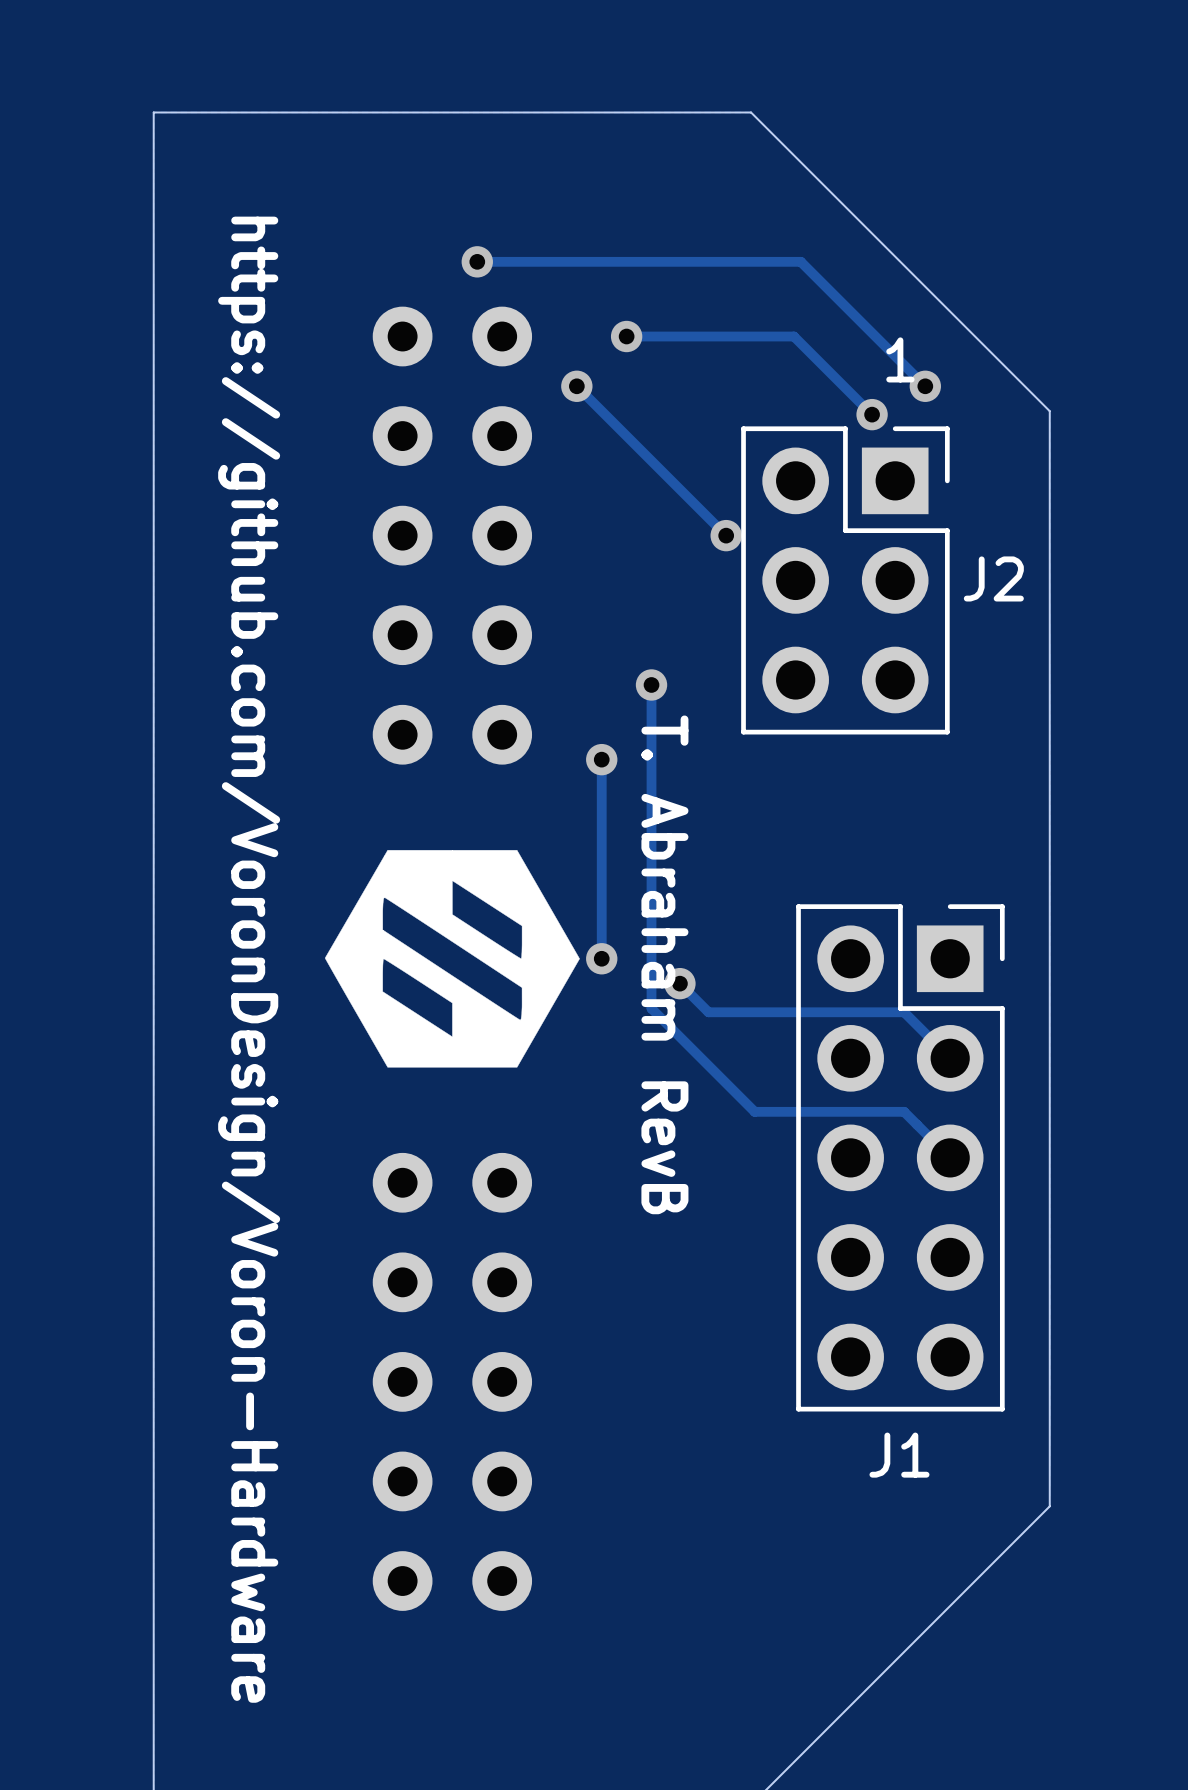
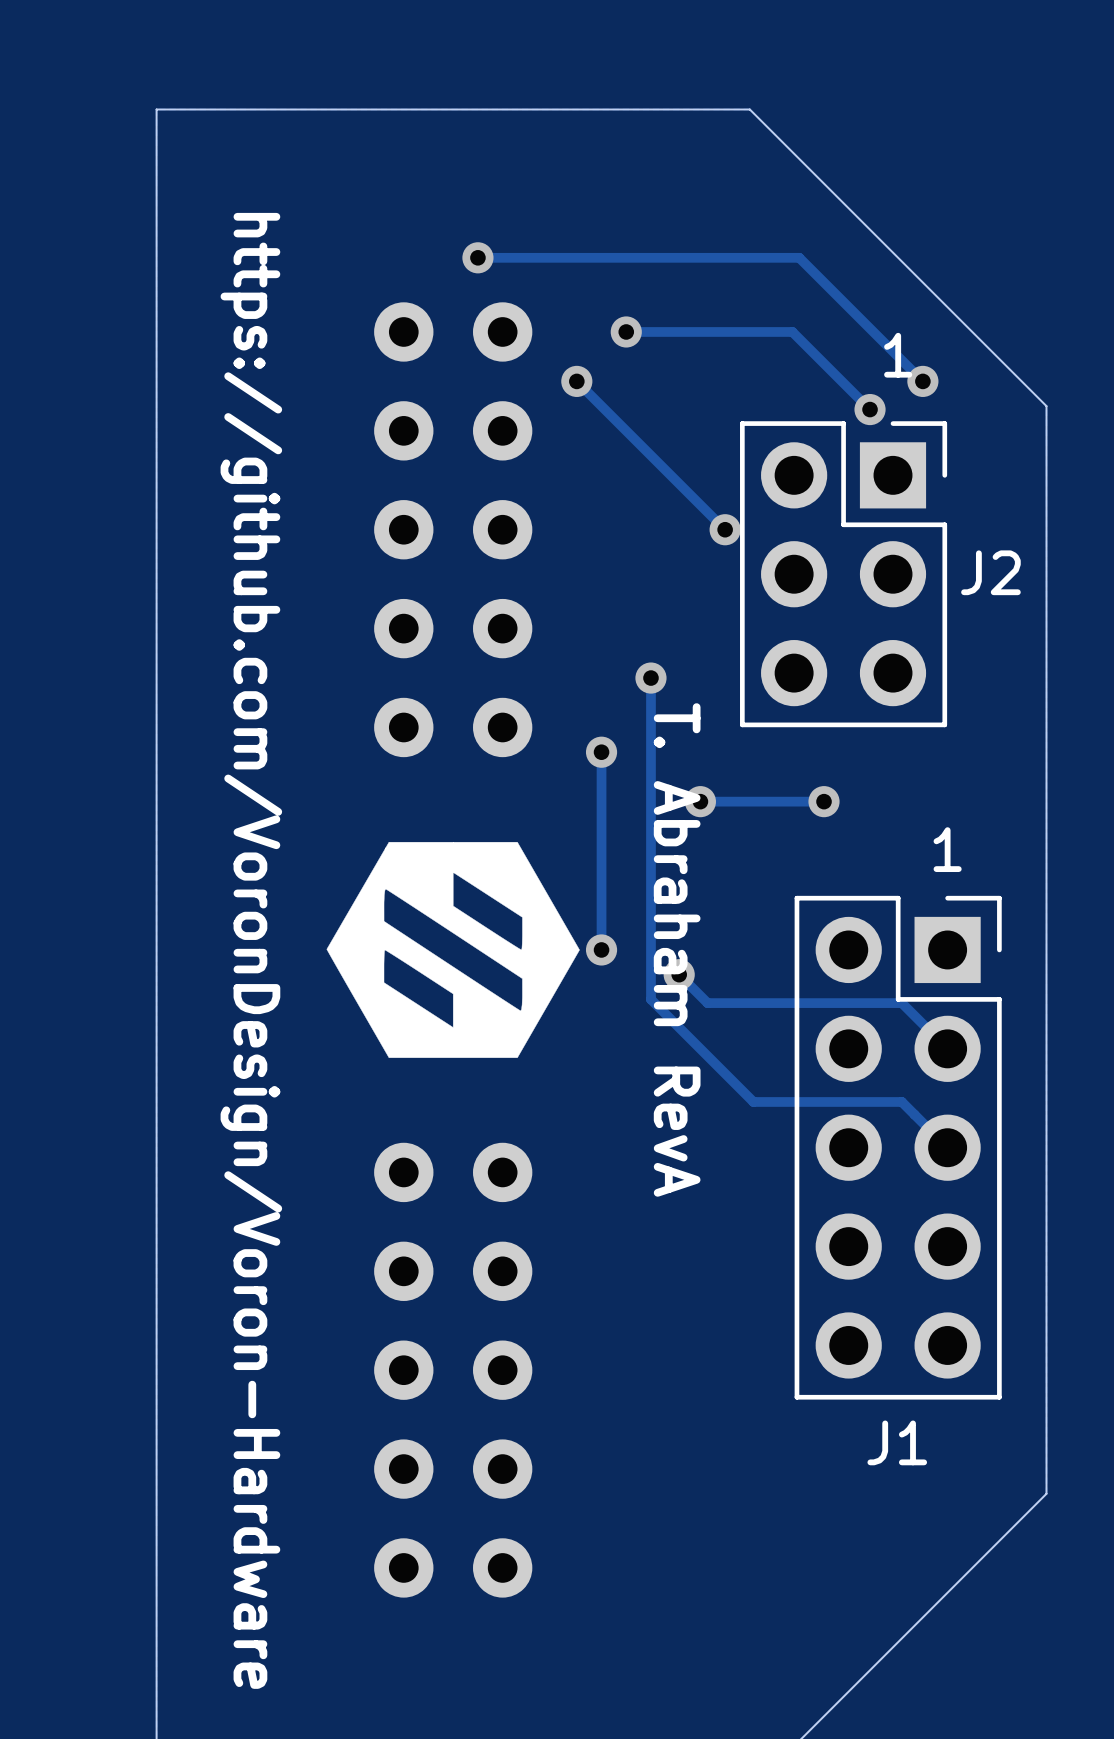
via: none -> (700, 801)
track: none -> (824, 801) (700, 801)
via: none -> (824, 801)
text: none -> 1 (947, 849)
text: T. Abraham RevB (664, 964) -> T. Abraham RevA (677, 949)

